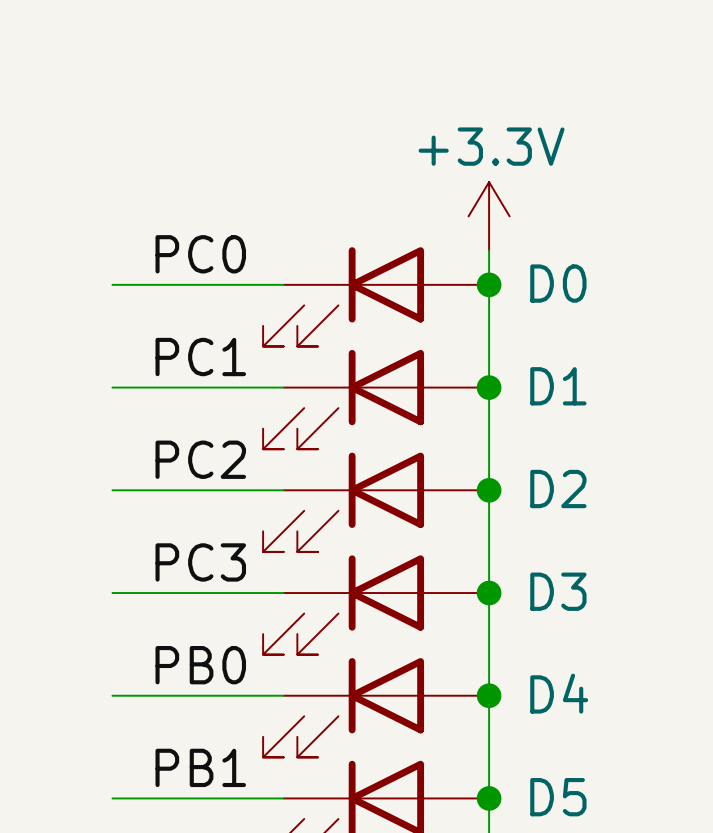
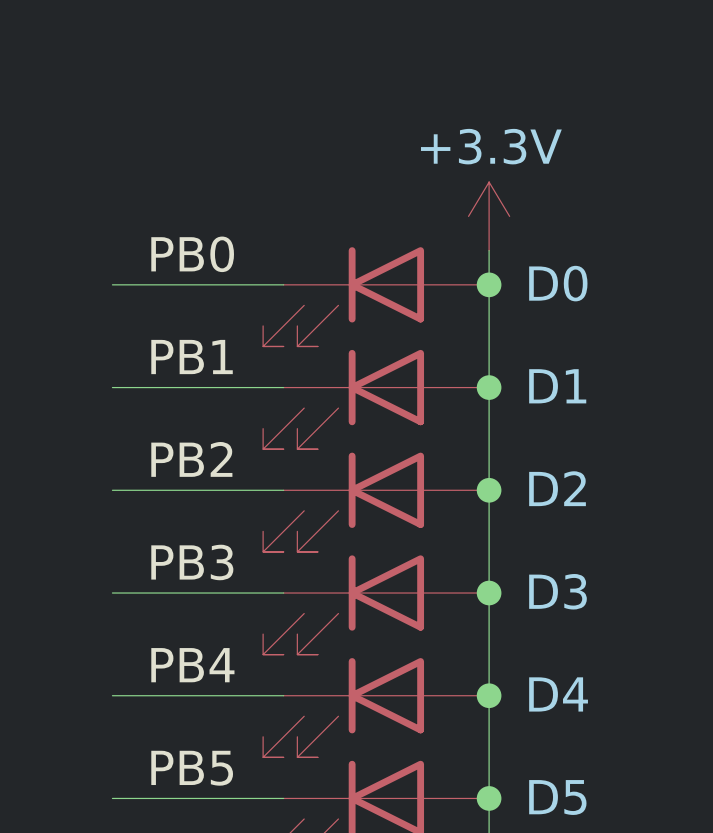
label: PC0 (200, 254) -> PB0 (192, 254)
label: PC1 (200, 357) -> PB1 (192, 357)
label: PC2 (200, 459) -> PB2 (191, 459)
label: PC3 (200, 562) -> PB3 (192, 562)
label: PB0 (200, 665) -> PB4 (192, 665)
label: PB1 (200, 767) -> PB5 (192, 768)

